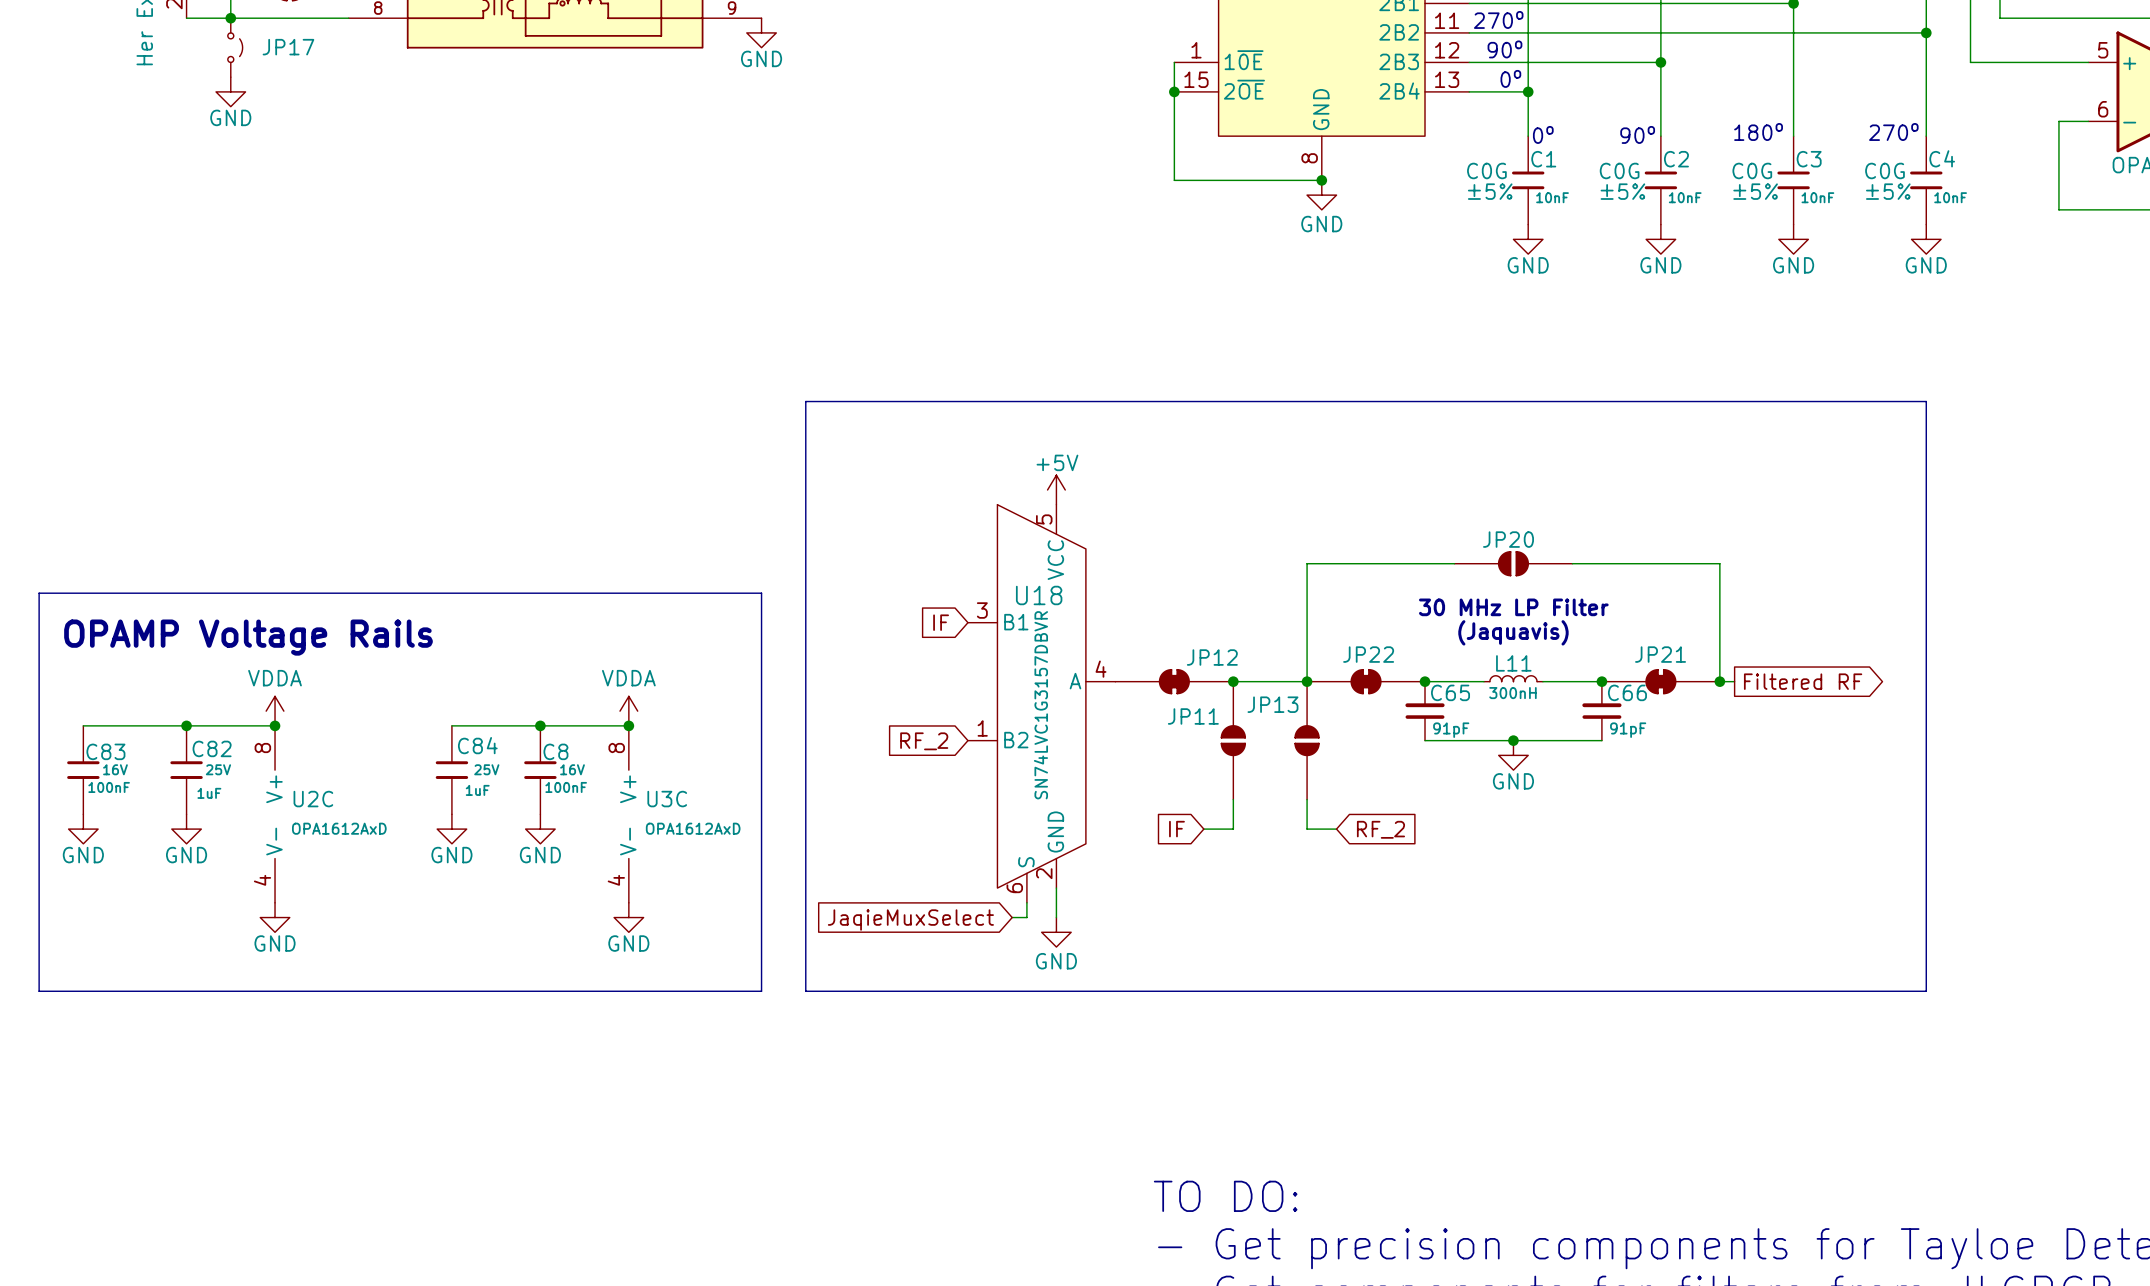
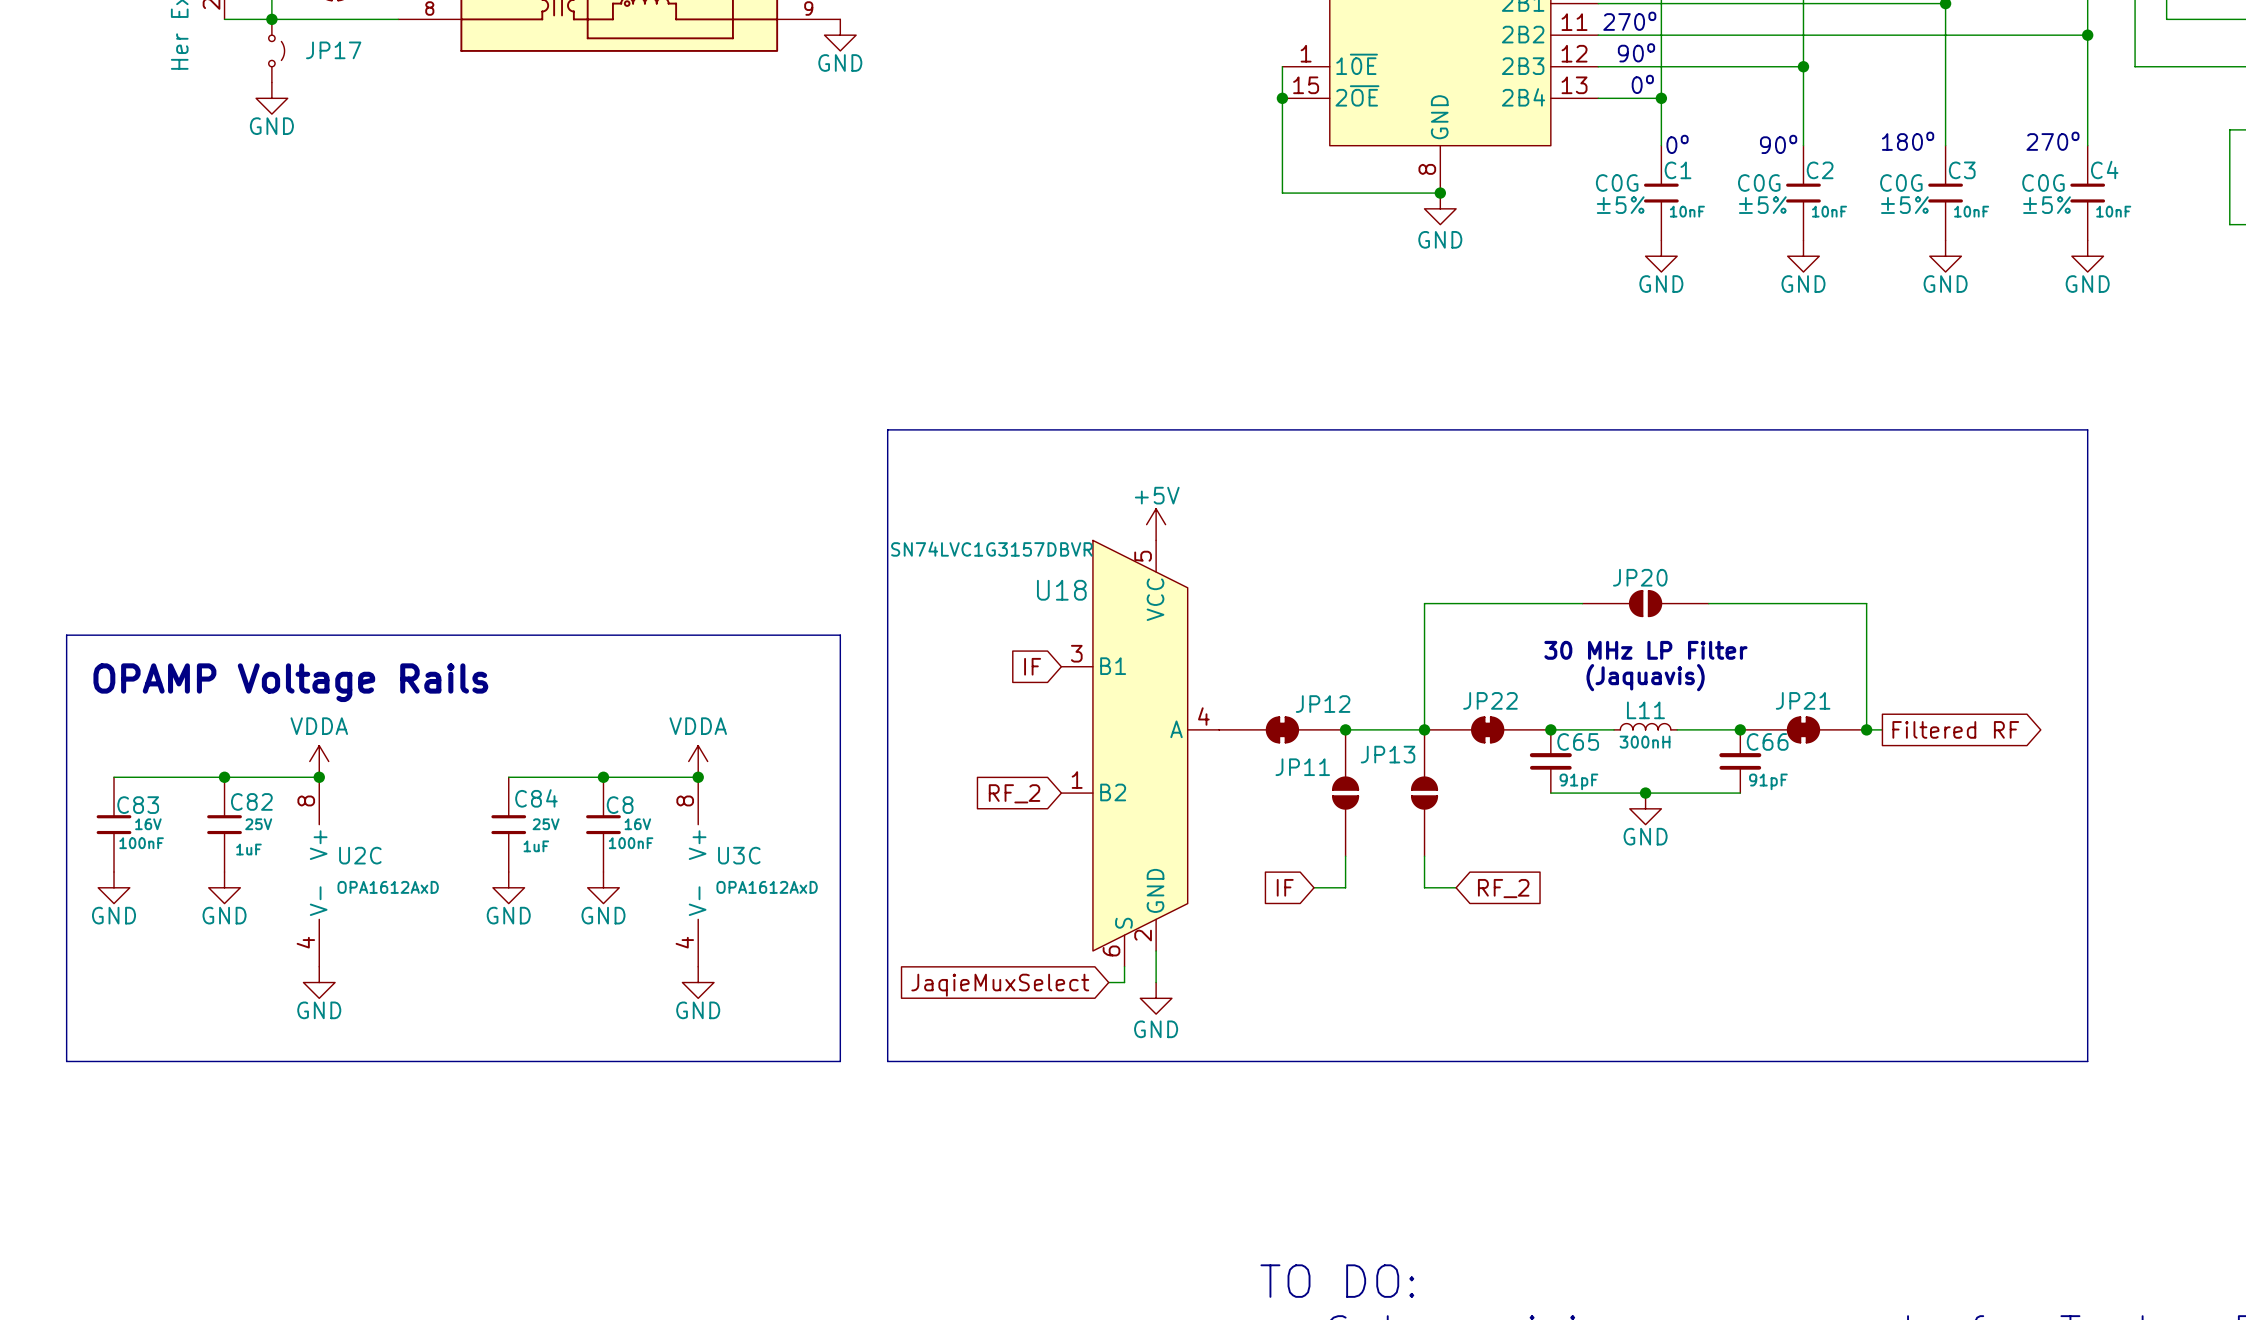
U18 symbol: [967, 504, 1116, 903] -> [1061, 540, 1220, 967]
U18 name position: U18 (1039, 595) -> U18 (1061, 590)
U18 value position: SN74LVC1G3157DBVR (1040, 705) -> SN74LVC1G3157DBVR (991, 549)

